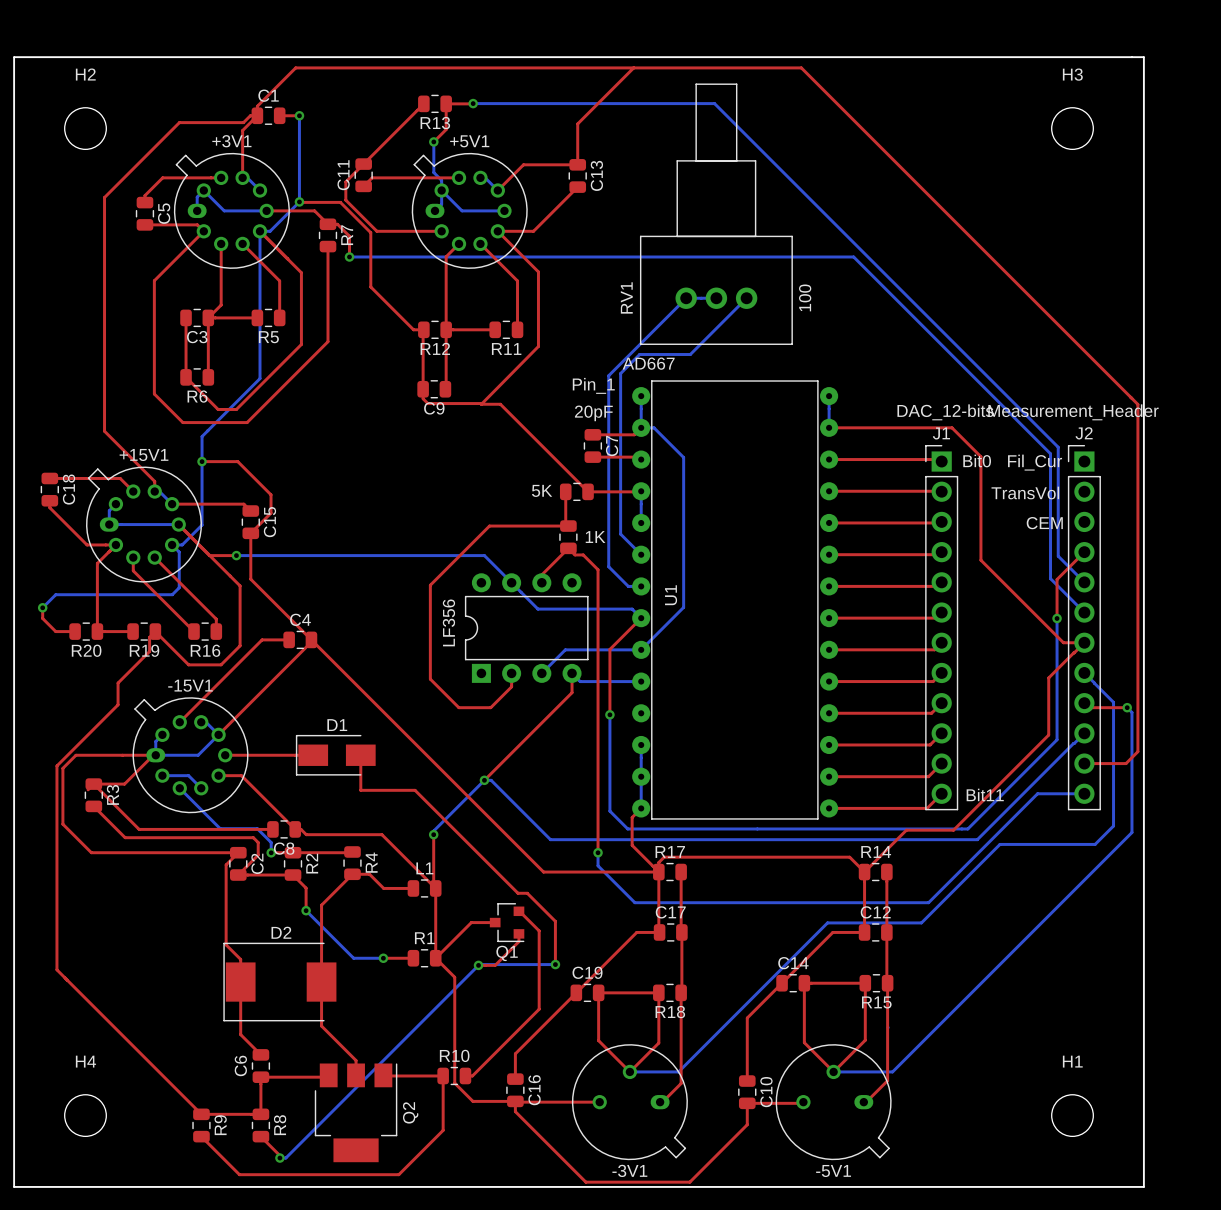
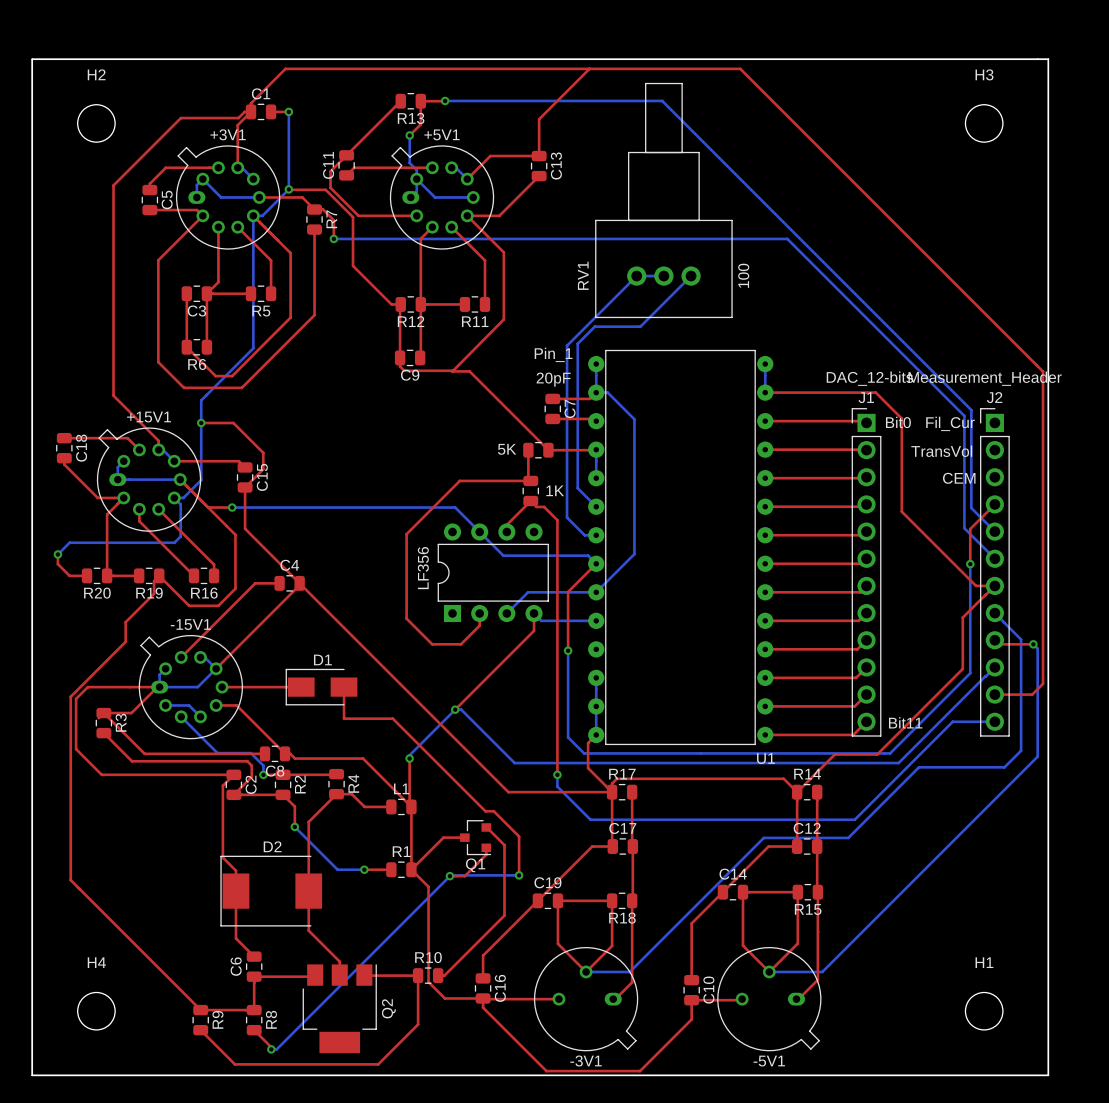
U1 value: AD667 (648, 363) -> none
U1 name rotation: 0° (671, 595) -> 90° clockwise (766, 758)
U1 name position: U1 (671, 595) -> U1 (766, 758)

